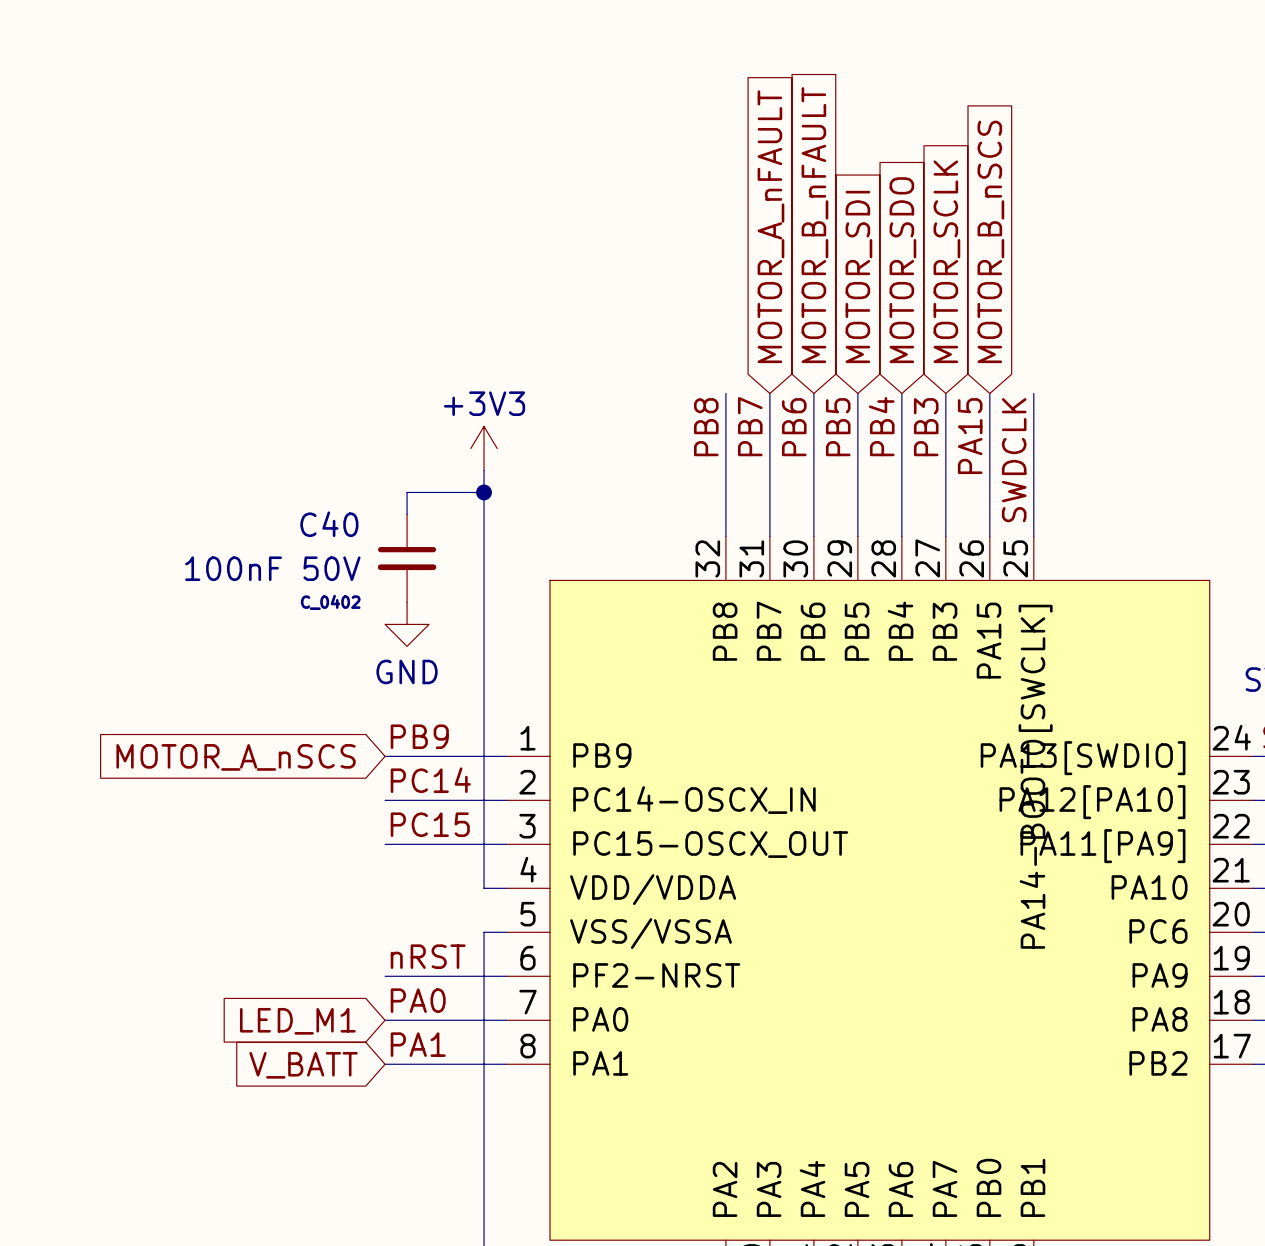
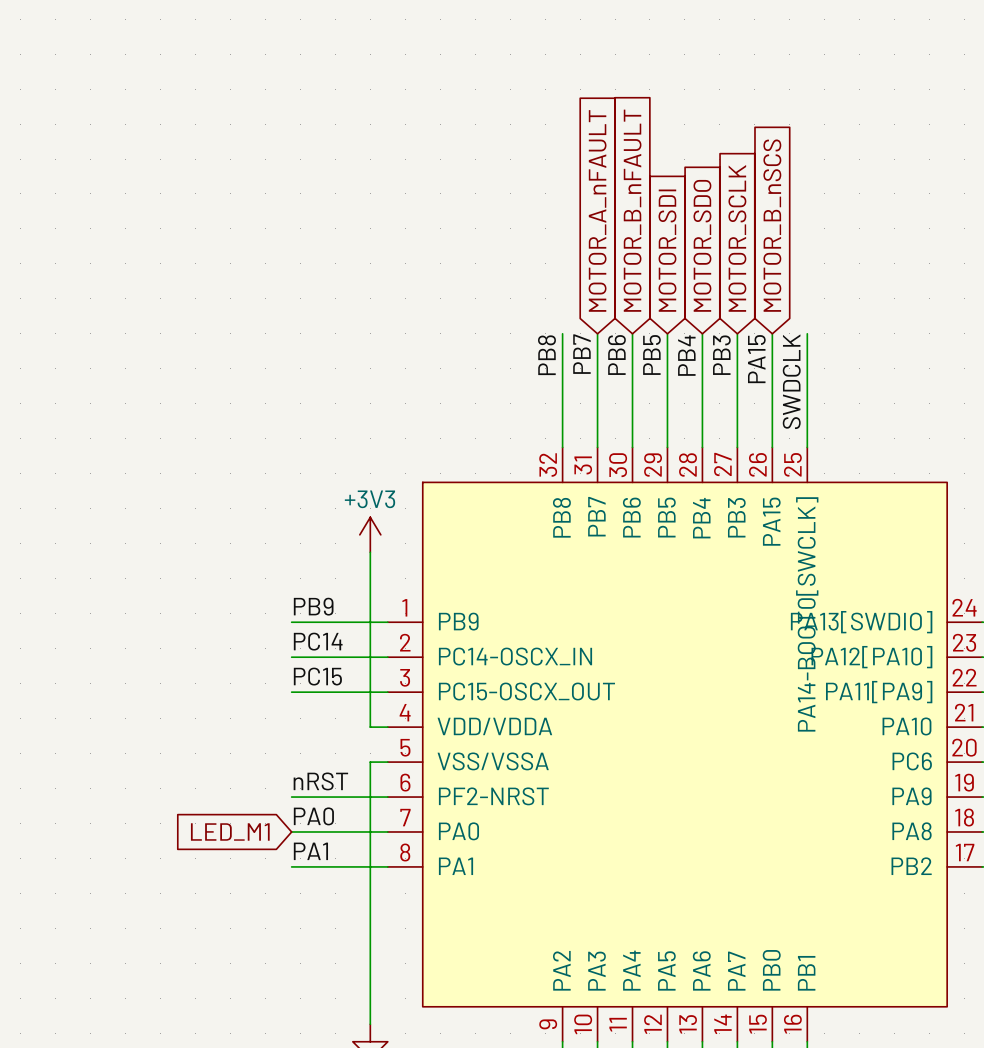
power symbol position: +3V3 (484, 448) -> +3V3 (370, 534)
wire: (484, 470) (484, 668) -> none
wire: (484, 492) (407, 492) (407, 514) -> none
junction: (484, 492) -> none
C40: 100nF 50V (407, 558) -> none
power symbol: GND (407, 624) -> none
global label: MOTOR_A_nSCS (236, 757) -> none
global label: V_BATT (303, 1065) -> none

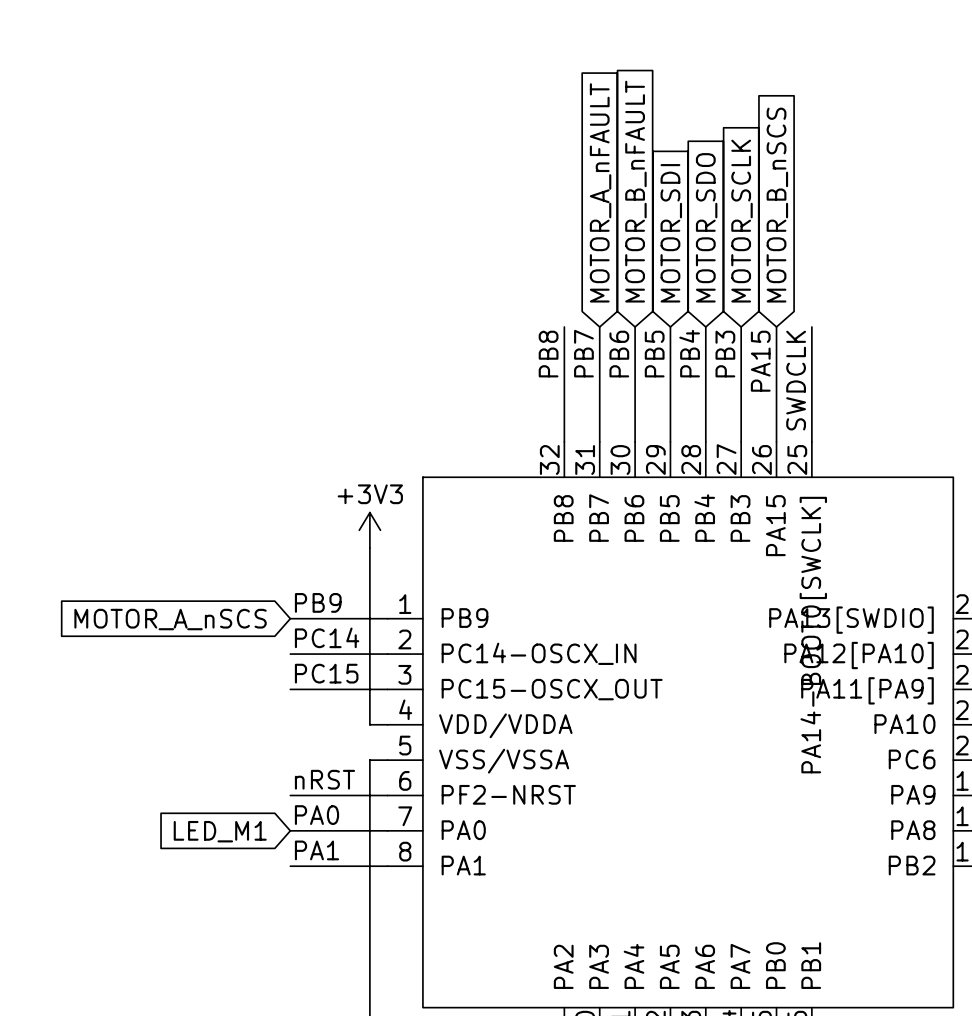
global label: none -> MOTOR_A_nSCS (170, 619)

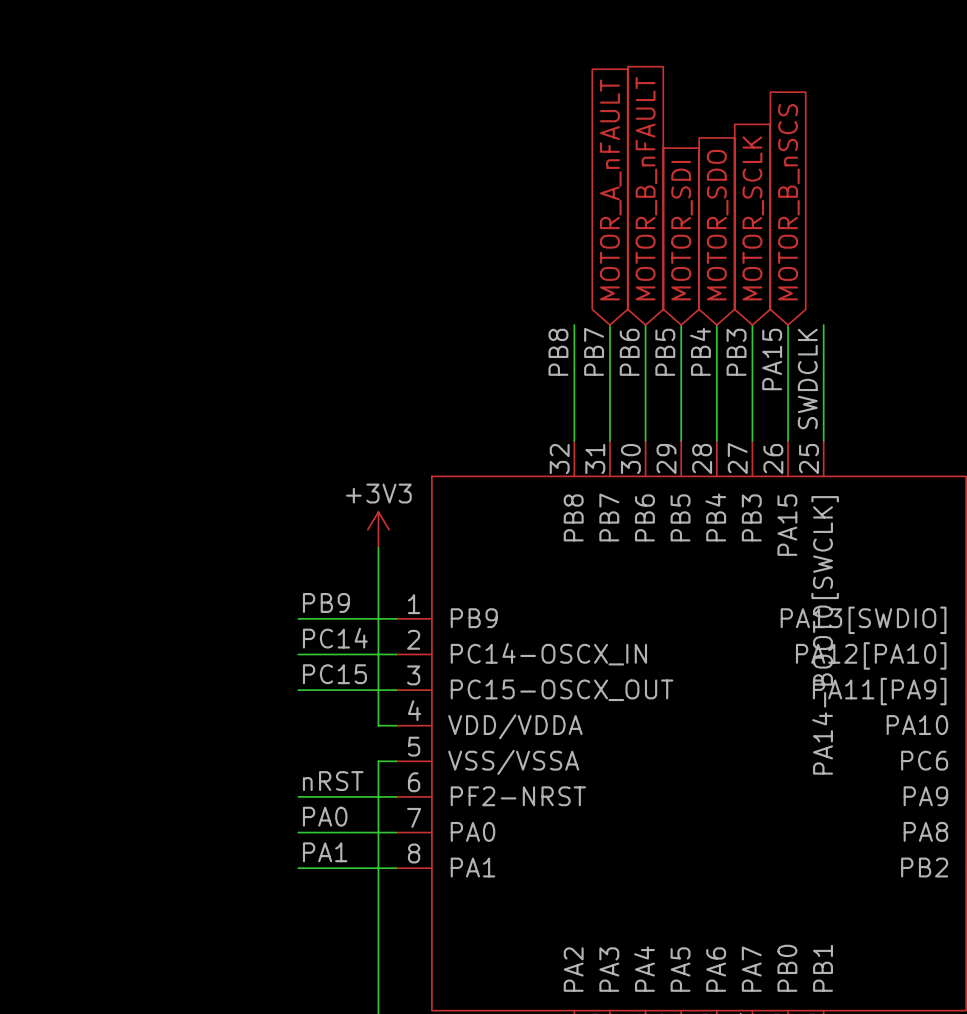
global label: MOTOR_A_nSCS (170, 619) -> none
global label: LED_M1 (220, 831) -> none

